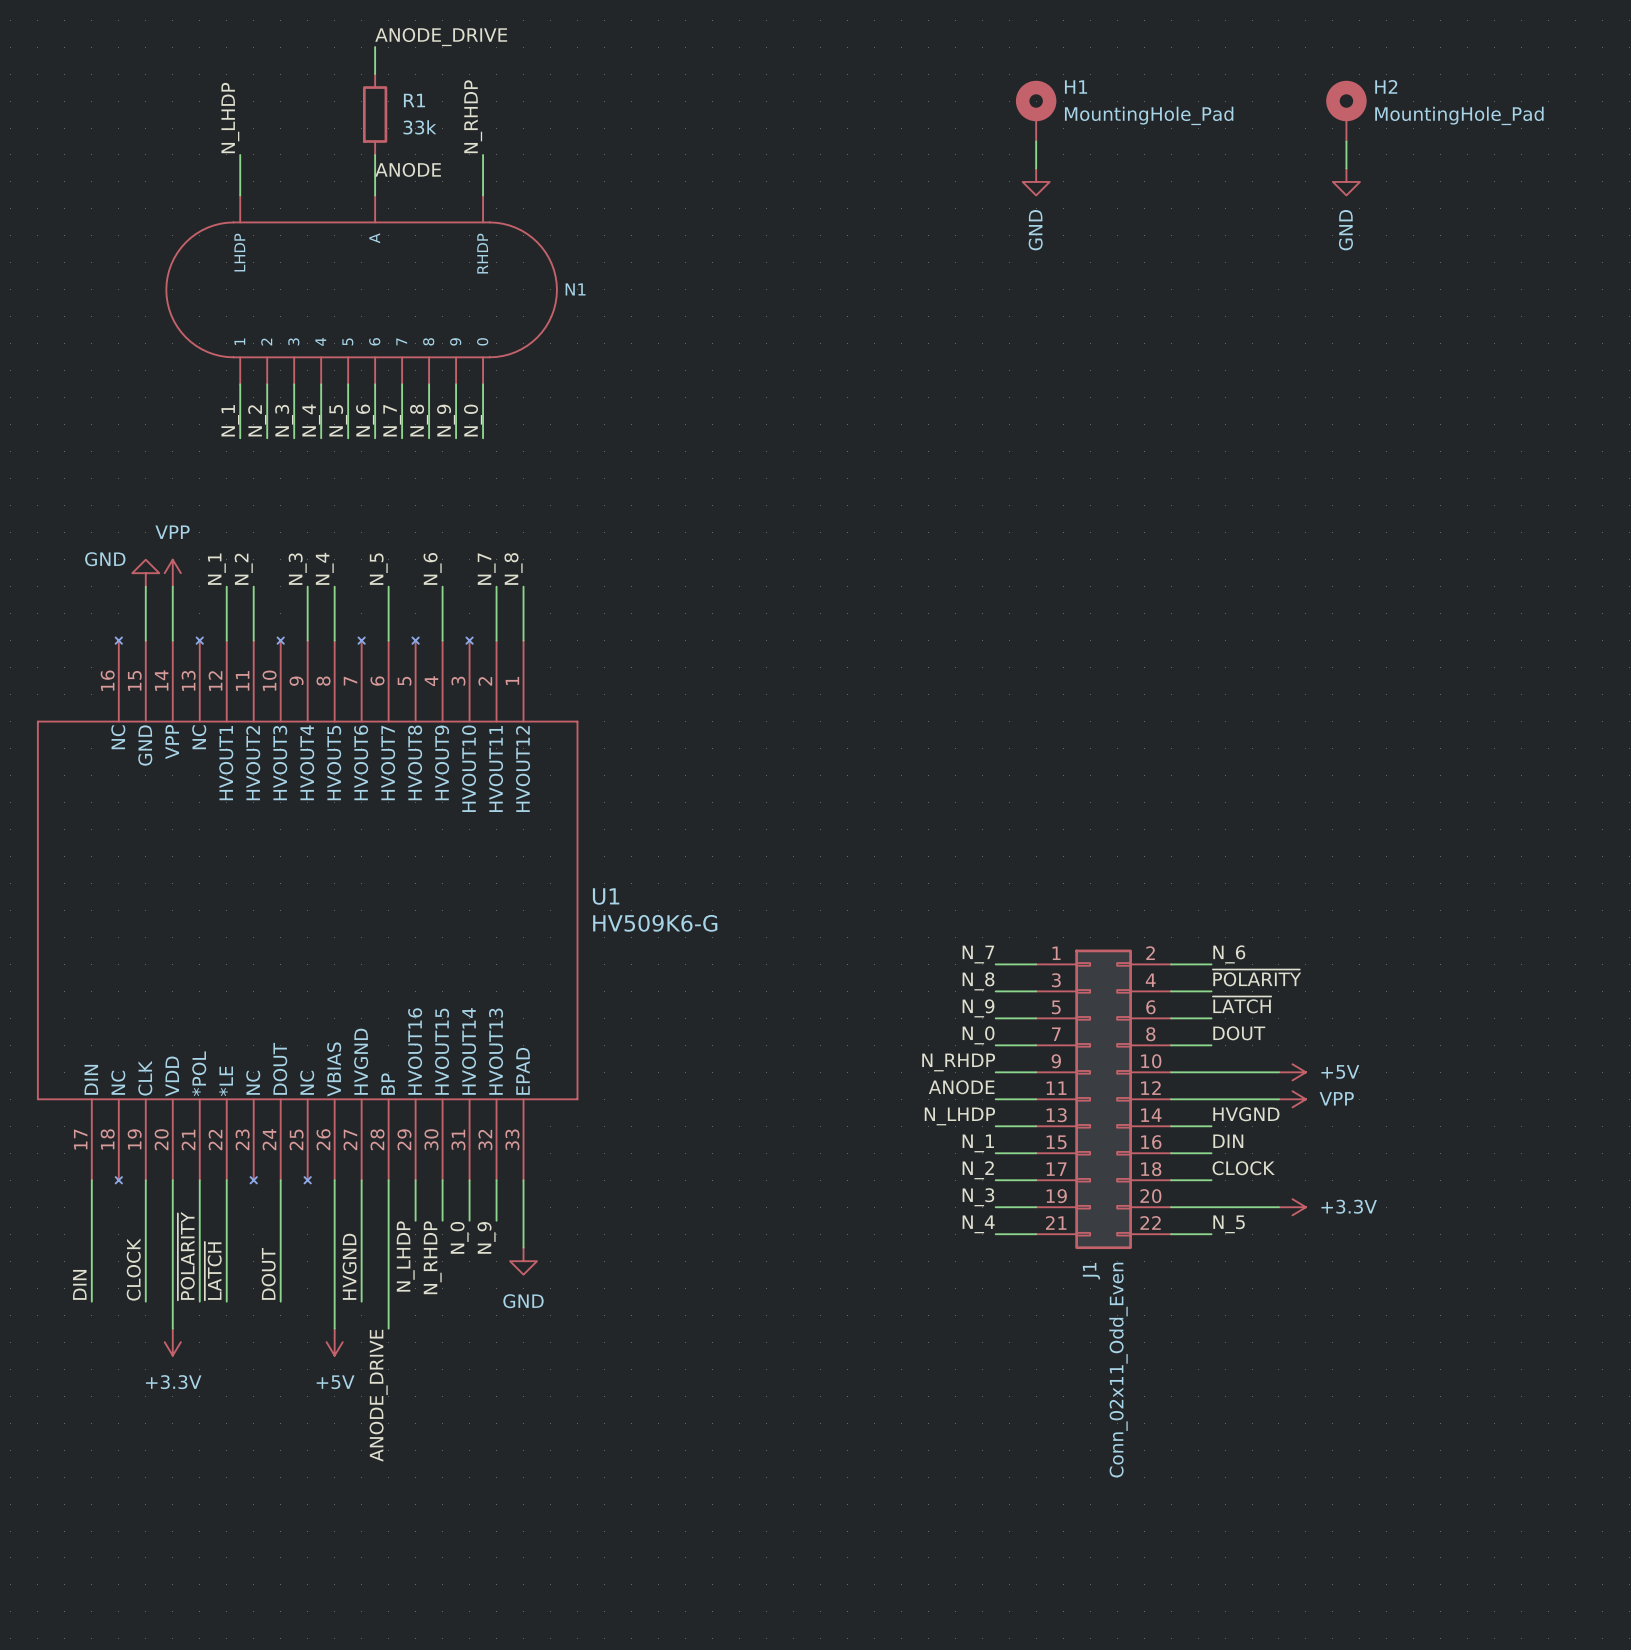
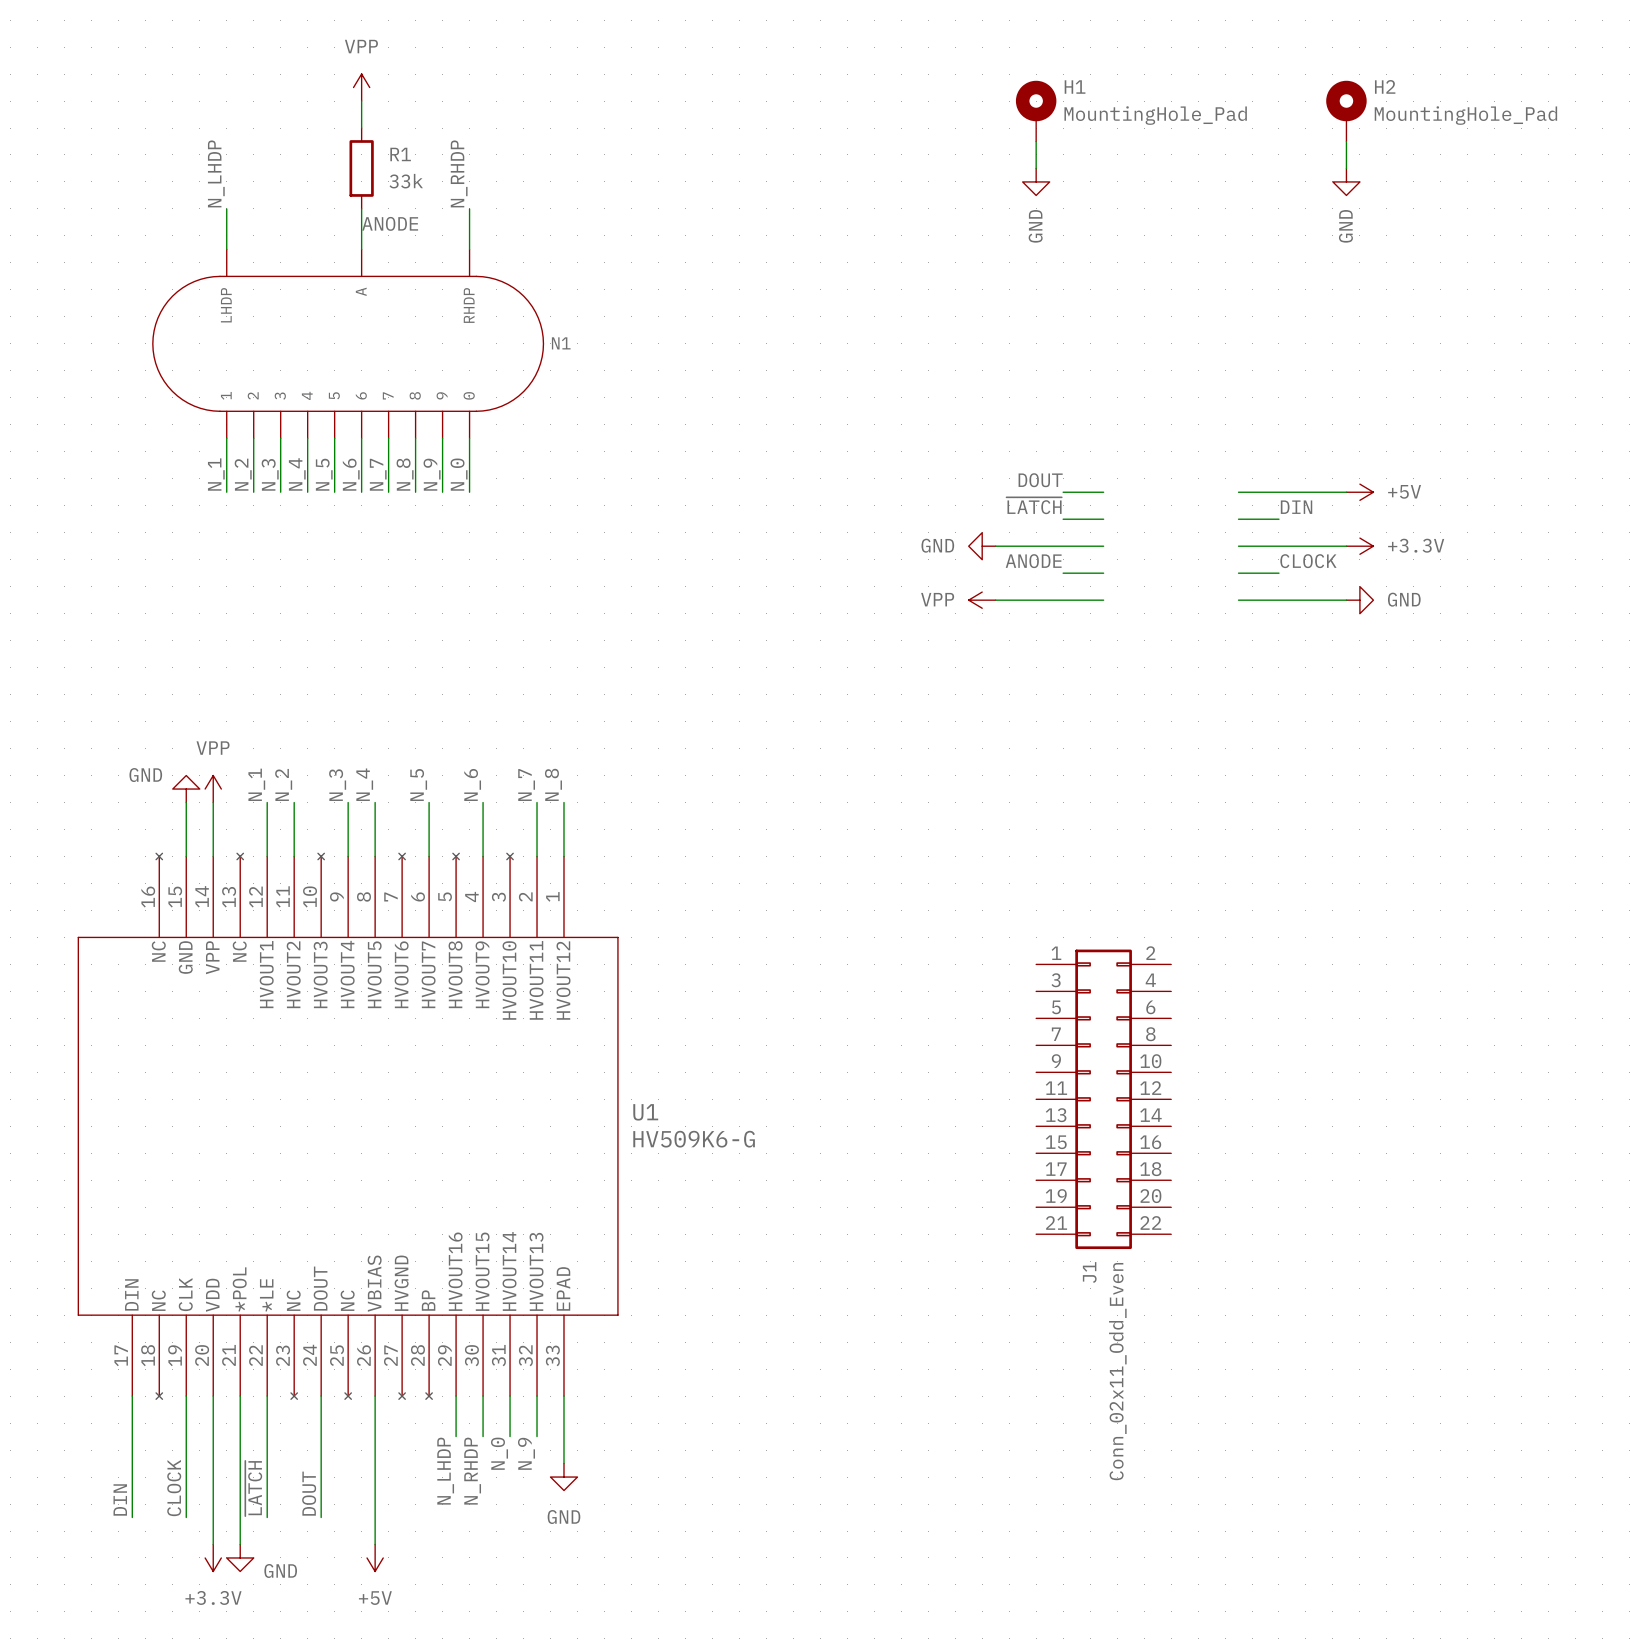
label: ANODE_DRIVE (441, 37) -> none
wire: (375, 47) (375, 74) -> (361, 101) (361, 128)
power symbol: none -> VPP (361, 87)
R1 position: (375, 114) -> (361, 168)
label position: N_RHDP (473, 116) -> N_RHDP (459, 173)
label position: N_LHDP (230, 118) -> N_LHDP (216, 173)
wire: (240, 154) (240, 195) -> (226, 208) (226, 249)
wire: (375, 154) (375, 195) -> (361, 208) (361, 249)
wire: (483, 154) (483, 195) -> (469, 208) (469, 249)
label position: ANODE (408, 169) -> ANODE (390, 223)
N1 position: (361, 289) -> (348, 343)
wire: (240, 384) (240, 438) -> (226, 438) (226, 492)
wire: (267, 384) (267, 438) -> (253, 438) (253, 492)
wire: (294, 384) (294, 438) -> (280, 438) (280, 492)
wire: (321, 384) (321, 438) -> (307, 438) (307, 492)
wire: (348, 384) (348, 438) -> (334, 438) (334, 492)
wire: (375, 384) (375, 438) -> (361, 438) (361, 492)
wire: (402, 384) (402, 438) -> (388, 438) (388, 492)
wire: (429, 384) (429, 438) -> (415, 438) (415, 492)
wire: (456, 384) (456, 438) -> (442, 438) (442, 492)
wire: (483, 384) (483, 438) -> (469, 438) (469, 492)
label: N_1 (230, 420) -> none
label: N_2 (257, 420) -> none
label: N_3 (284, 420) -> none
label: N_4 (311, 420) -> none
label: N_5 (338, 420) -> none
label position: N_6 (365, 420) -> N_6 (351, 474)
label position: N_7 (392, 420) -> N_7 (378, 474)
label position: N_8 (419, 420) -> N_8 (405, 474)
label position: N_9 (446, 420) -> N_9 (432, 474)
label position: N_0 (473, 420) -> N_0 (459, 474)
label: none -> N_1 (216, 474)
label: none -> N_2 (243, 474)
label: none -> N_3 (270, 474)
label: none -> N_4 (297, 474)
label: none -> N_5 (324, 474)
label: none -> DOUT (1040, 480)
wire: none -> (1063, 492) (1103, 492)
wire: none -> (1238, 492) (1346, 492)
power symbol: none -> +5V (1359, 492)
label: none -> ~{LATCH} (1034, 505)
label: none -> DIN (1296, 507)
wire: none -> (1063, 519) (1103, 519)
wire: none -> (1238, 519) (1278, 519)
power symbol: none -> GND (982, 546)
wire: none -> (995, 546) (1103, 546)
wire: none -> (1238, 546) (1346, 546)
power symbol: none -> +3.3V (1359, 546)
label: none -> ANODE (1033, 561)
label: none -> CLOCK (1308, 561)
label: N_4 (324, 568) -> none
label: N_6 (432, 568) -> none
label: N_8 (513, 568) -> none
label: N_1 (216, 569) -> none
label: N_2 (243, 569) -> none
label: N_3 (297, 569) -> none
label: N_5 (378, 569) -> none
label: N_7 (486, 569) -> none
power symbol position: GND (145, 573) -> GND (186, 789)
power symbol position: VPP (172, 573) -> VPP (213, 789)
wire: none -> (1063, 573) (1103, 573)
wire: none -> (1238, 573) (1278, 573)
wire: (145, 586) (145, 640) -> (186, 802) (186, 856)
wire: (172, 586) (172, 640) -> (213, 802) (213, 856)
wire: (226, 586) (226, 640) -> (267, 802) (267, 856)
wire: (253, 586) (253, 640) -> (294, 802) (294, 856)
wire: (307, 586) (307, 640) -> (348, 802) (348, 856)
wire: (334, 586) (334, 640) -> (375, 802) (375, 856)
wire: (388, 586) (388, 640) -> (429, 802) (429, 856)
wire: (442, 586) (442, 640) -> (483, 802) (483, 856)
wire: (496, 586) (496, 640) -> (537, 802) (537, 856)
wire: (523, 586) (523, 640) -> (563, 802) (563, 856)
power symbol: none -> VPP (982, 600)
wire: none -> (995, 600) (1103, 600)
wire: none -> (1238, 600) (1346, 600)
power symbol: none -> GND (1359, 600)
U1 symbol: [37, 637, 579, 1184] -> [77, 853, 619, 1400]
label: none -> N_3 (337, 785)
label: none -> N_4 (364, 784)
label: none -> N_5 (418, 785)
label: none -> N_6 (472, 784)
label: none -> N_7 (526, 785)
label: none -> N_8 (553, 784)
label: none -> N_1 (256, 784)
label: none -> N_2 (283, 784)
label: N_7 (978, 954) -> none
label: N_6 (1229, 954) -> none
wire: (995, 964) (1036, 964) -> none
wire: (1171, 964) (1211, 964) -> none
label: ~{POLARITY} (1257, 977) -> none
label: N_8 (978, 981) -> none
wire: (995, 991) (1036, 991) -> none
wire: (1171, 991) (1211, 991) -> none
label: ~{LATCH} (1242, 1004) -> none
label: N_9 (978, 1008) -> none
wire: (995, 1018) (1036, 1018) -> none
wire: (1171, 1018) (1211, 1018) -> none
label: DOUT (1239, 1033) -> none
label: N_0 (978, 1035) -> none
wire: (995, 1045) (1036, 1045) -> none
wire: (1171, 1045) (1211, 1045) -> none
label: N_RHDP (958, 1062) -> none
wire: (995, 1072) (1036, 1072) -> none
wire: (1171, 1072) (1278, 1072) -> none
power symbol: +5V (1292, 1072) -> none
label: ANODE (961, 1087) -> none
wire: (995, 1099) (1036, 1099) -> none
wire: (1171, 1099) (1278, 1099) -> none
power symbol: VPP (1292, 1099) -> none
label: HVGND (1246, 1114) -> none
label: N_LHDP (959, 1116) -> none
wire: (995, 1126) (1036, 1126) -> none
wire: (1171, 1126) (1211, 1126) -> none
label: DIN (1228, 1141) -> none
label: N_1 (978, 1143) -> none
wire: (995, 1153) (1036, 1153) -> none
wire: (1171, 1153) (1211, 1153) -> none
label: CLOCK (1243, 1168) -> none
label: N_2 (978, 1170) -> none
wire: (91, 1180) (91, 1301) -> (132, 1396) (132, 1517)
wire: (145, 1180) (145, 1301) -> (186, 1396) (186, 1517)
wire: (172, 1180) (172, 1328) -> (213, 1396) (213, 1544)
wire: (199, 1180) (199, 1301) -> none
wire: (226, 1180) (226, 1301) -> (267, 1396) (267, 1517)
wire: (280, 1180) (280, 1301) -> (321, 1396) (321, 1517)
wire: (334, 1180) (334, 1328) -> (375, 1396) (375, 1544)
wire: (361, 1180) (361, 1301) -> none
wire: (388, 1180) (388, 1328) -> (240, 1396) (240, 1544)
wire: (415, 1180) (415, 1220) -> (456, 1396) (456, 1436)
wire: (442, 1180) (442, 1220) -> (483, 1396) (483, 1436)
wire: (469, 1180) (469, 1220) -> (510, 1396) (510, 1436)
wire: (496, 1180) (496, 1220) -> (537, 1396) (537, 1436)
wire: (523, 1180) (523, 1247) -> (563, 1396) (563, 1463)
wire: (995, 1180) (1036, 1180) -> none
wire: (1171, 1180) (1211, 1180) -> none
label: N_3 (978, 1197) -> none
wire: (995, 1207) (1036, 1207) -> none
wire: (1171, 1207) (1278, 1207) -> none
power symbol: +3.3V (1292, 1207) -> none
label: N_4 (978, 1224) -> none
label: N_5 (1229, 1224) -> none
wire: (995, 1234) (1036, 1234) -> none
wire: (1171, 1234) (1211, 1234) -> none
label position: N_0 (459, 1237) -> N_0 (499, 1453)
label position: N_9 (486, 1237) -> N_9 (526, 1453)
label: ~{POLARITY} (186, 1256) -> none
label position: N_LHDP (405, 1256) -> N_LHDP (445, 1471)
label position: N_RHDP (432, 1257) -> N_RHDP (472, 1471)
power symbol: GND (523, 1261) -> none
label: HVGND (349, 1266) -> none
label position: CLOCK (133, 1269) -> CLOCK (174, 1488)
label position: ~{LATCH} (213, 1271) -> ~{LATCH} (253, 1488)
label position: DOUT (268, 1273) -> DOUT (309, 1493)
label position: DIN (79, 1284) -> DIN (120, 1499)
power symbol position: +3.3V (172, 1342) -> +3.3V (213, 1557)
power symbol position: +5V (334, 1342) -> +5V (375, 1557)
label: ANODE_DRIVE (378, 1395) -> none
power symbol: none -> GND (563, 1477)
power symbol: none -> GND (240, 1557)

